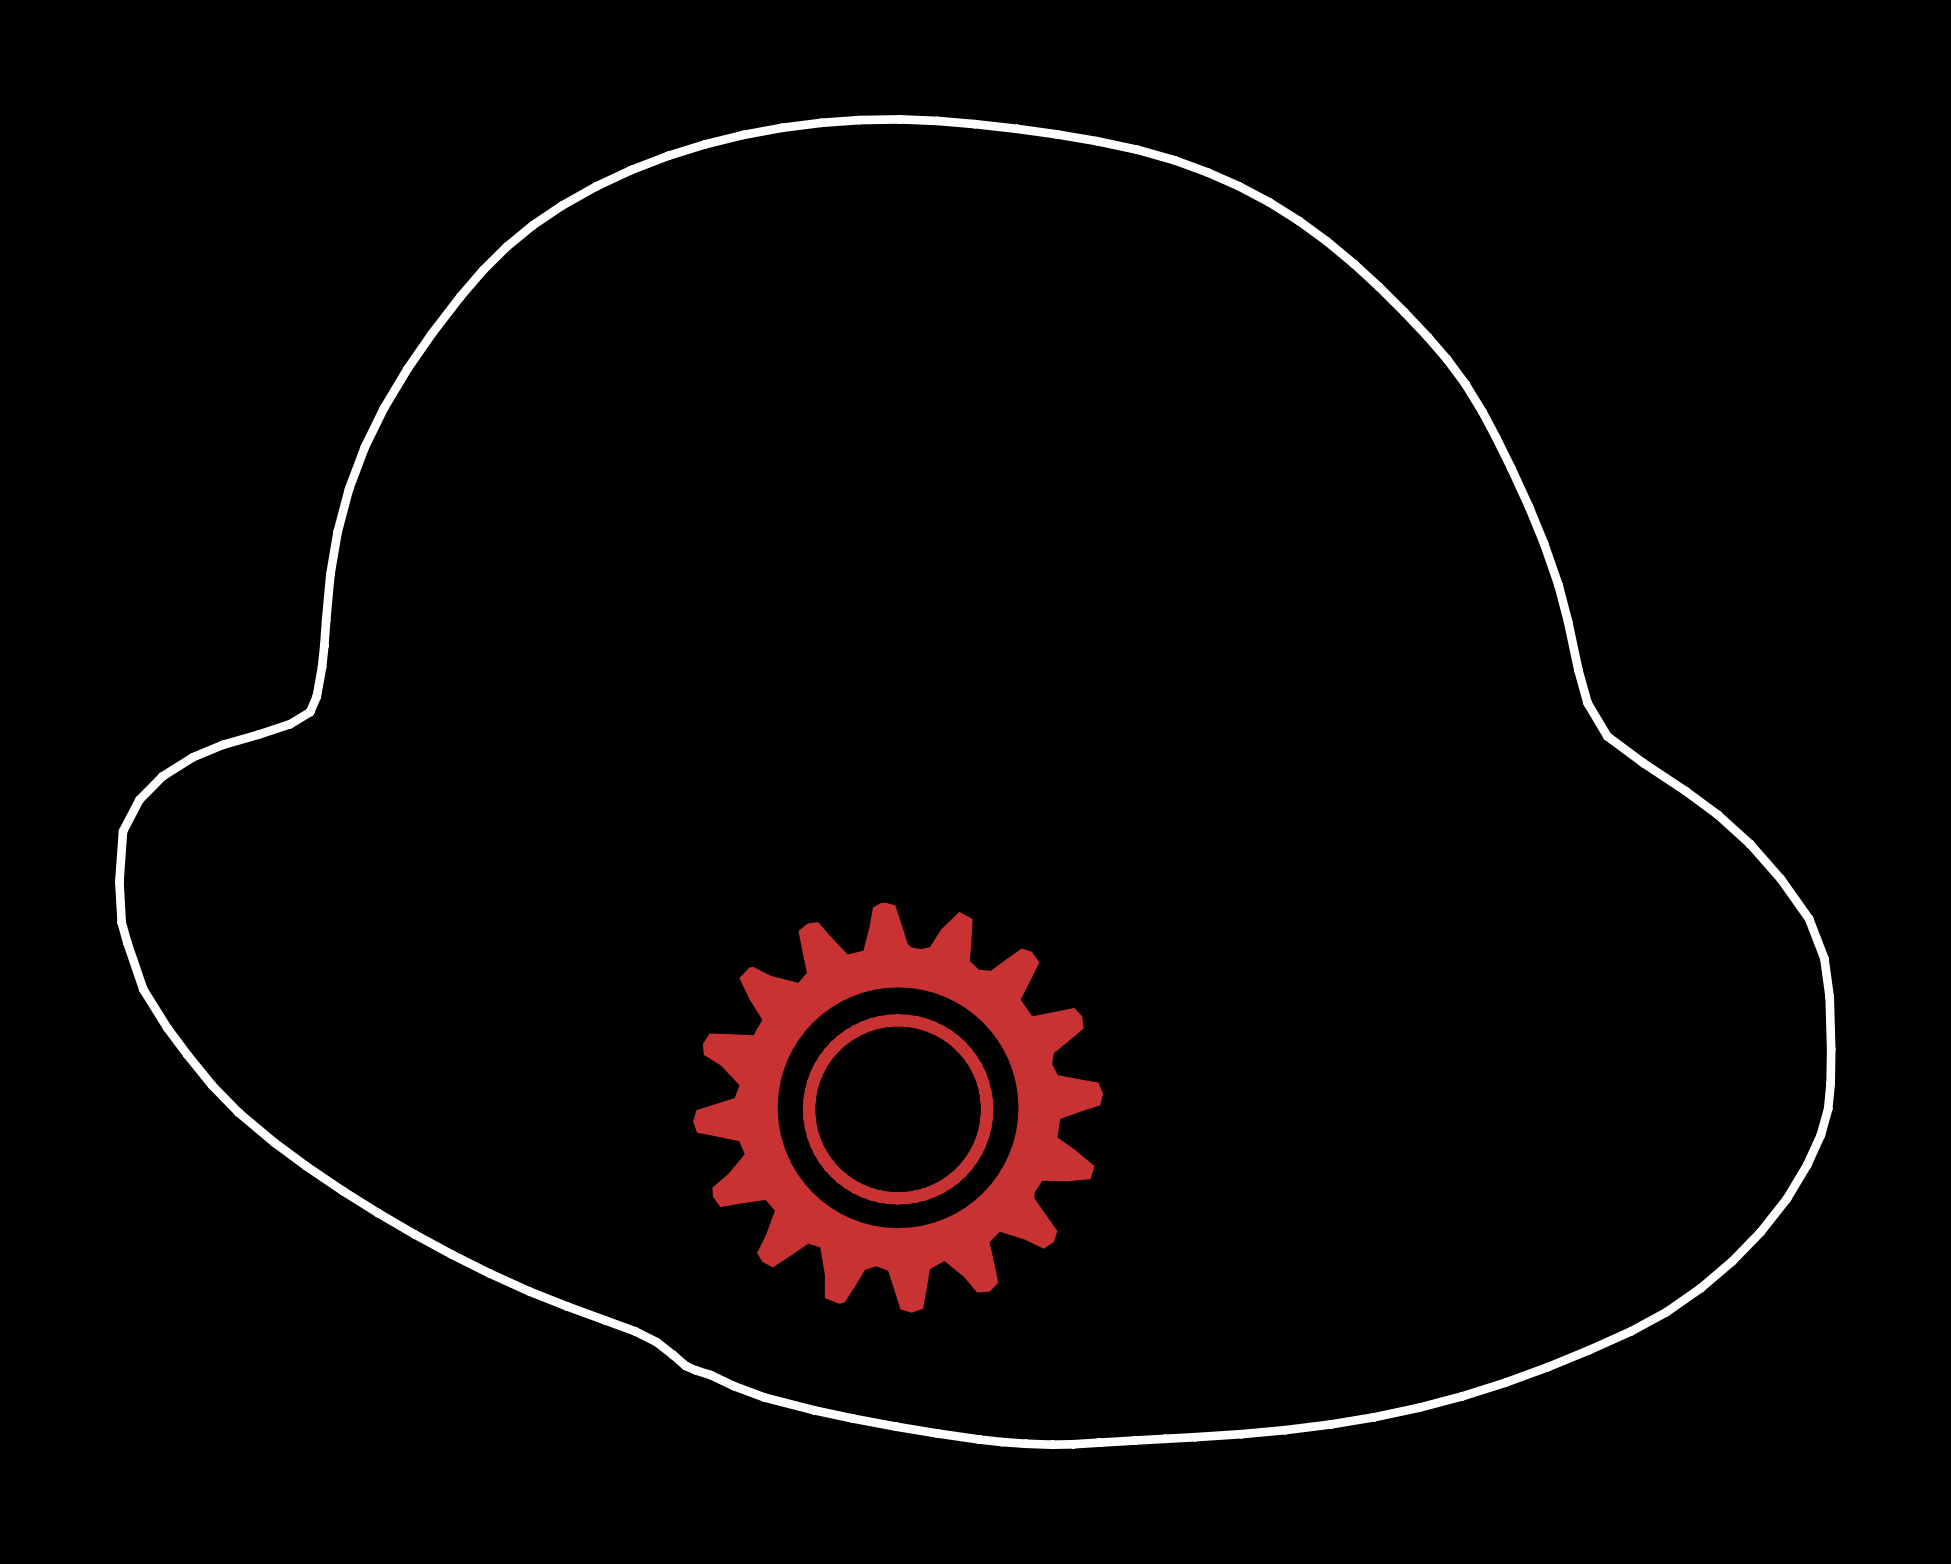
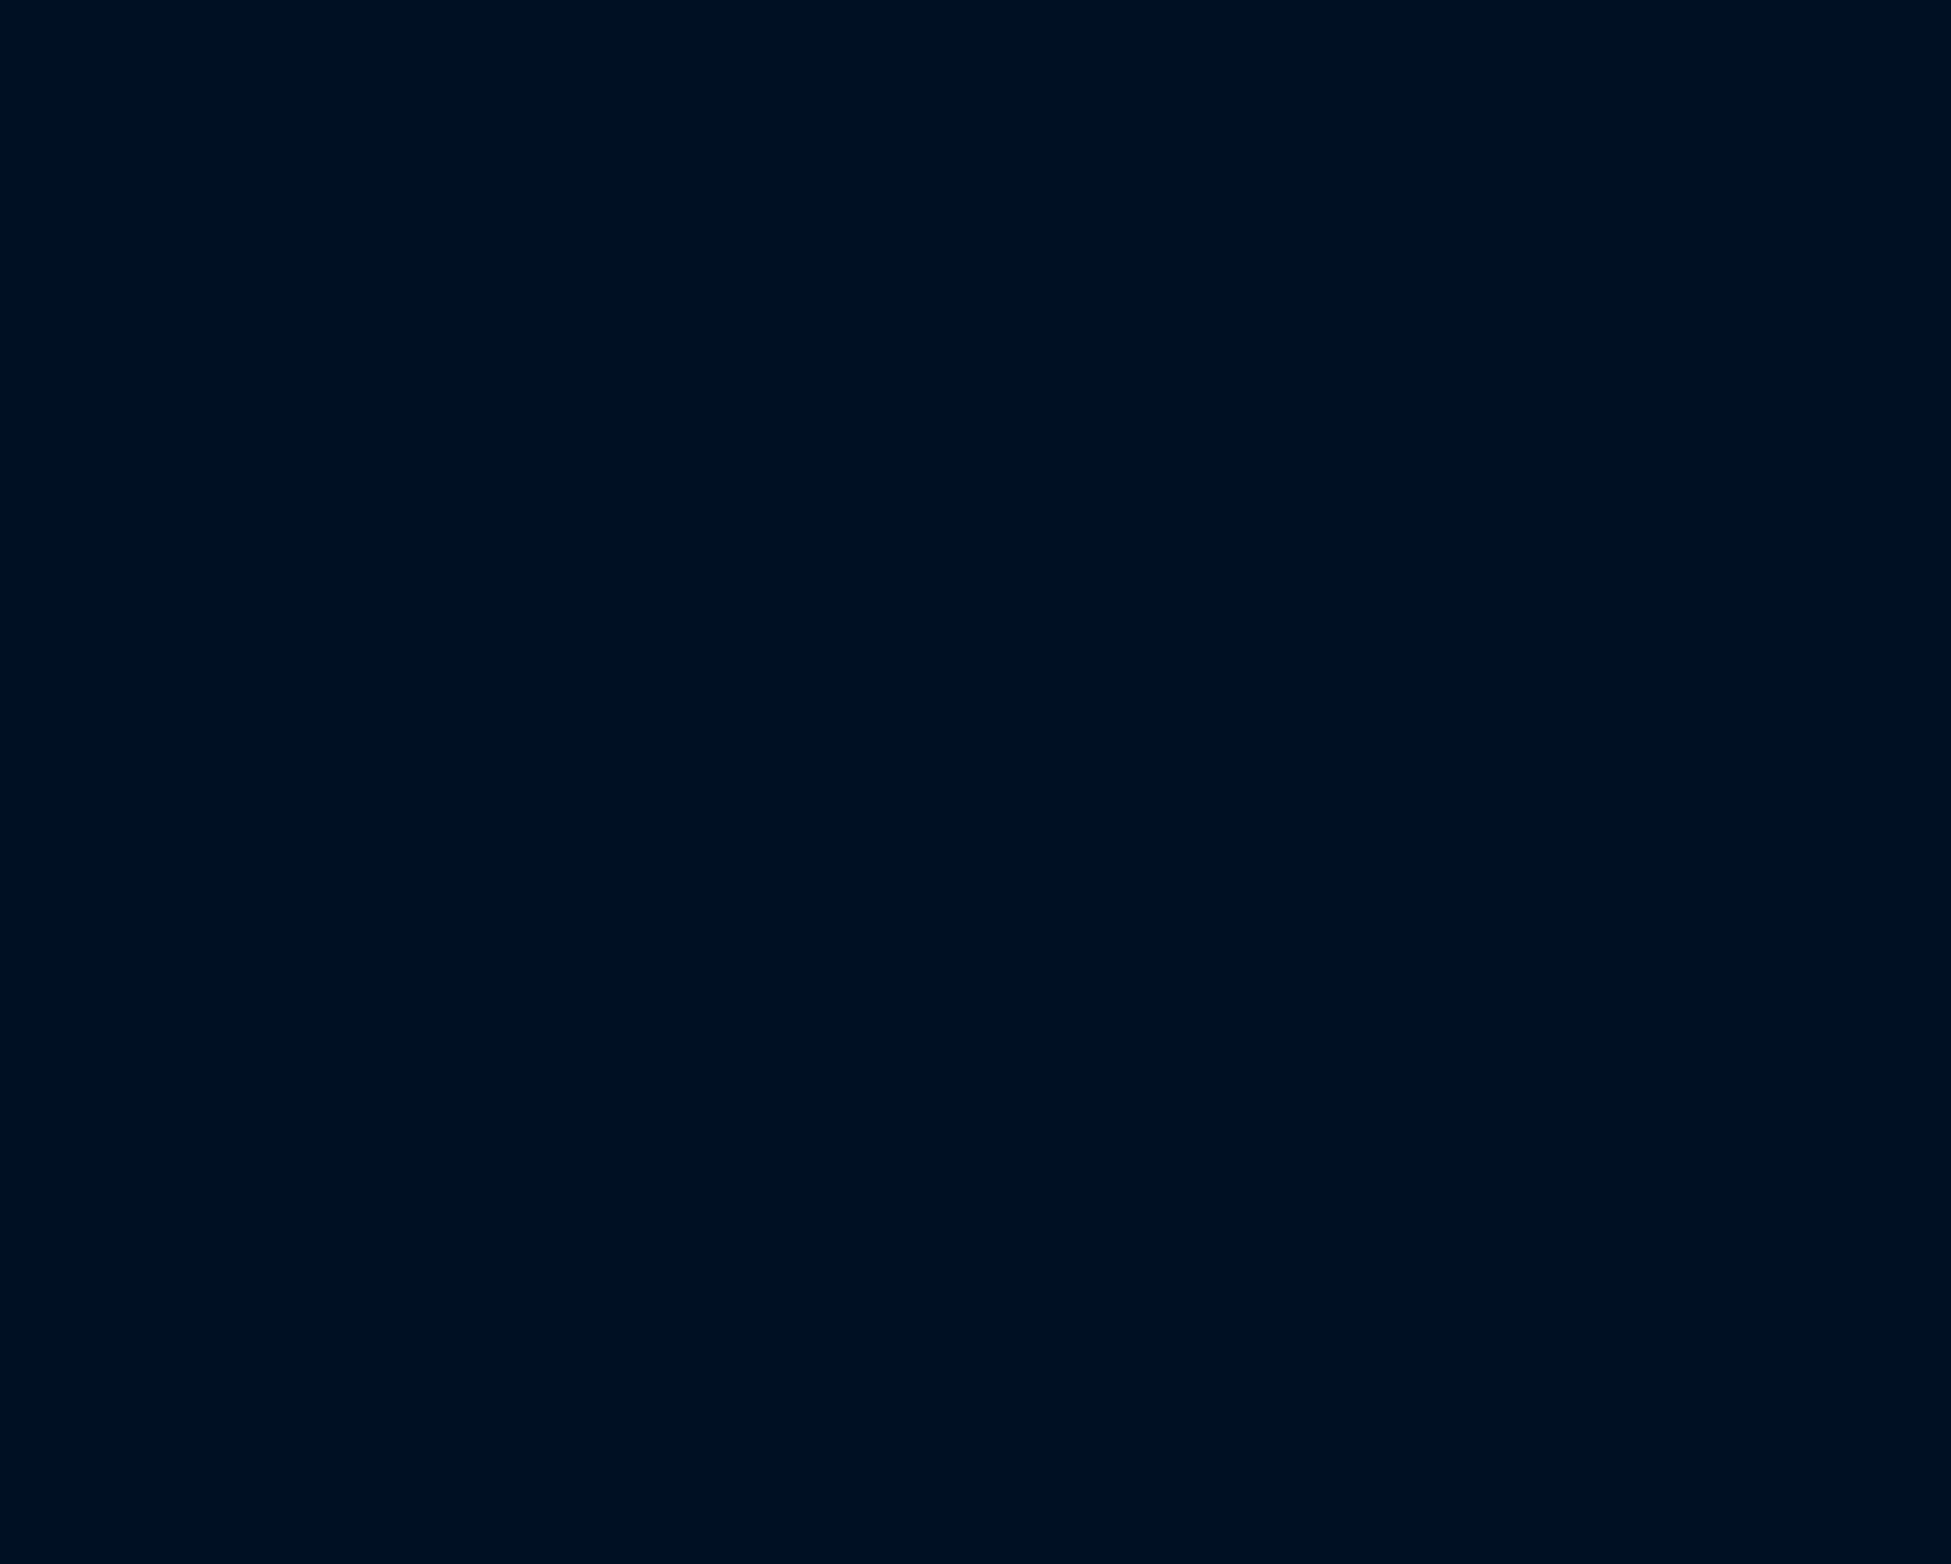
drawing: [115, 115, 1836, 1450] -> none

